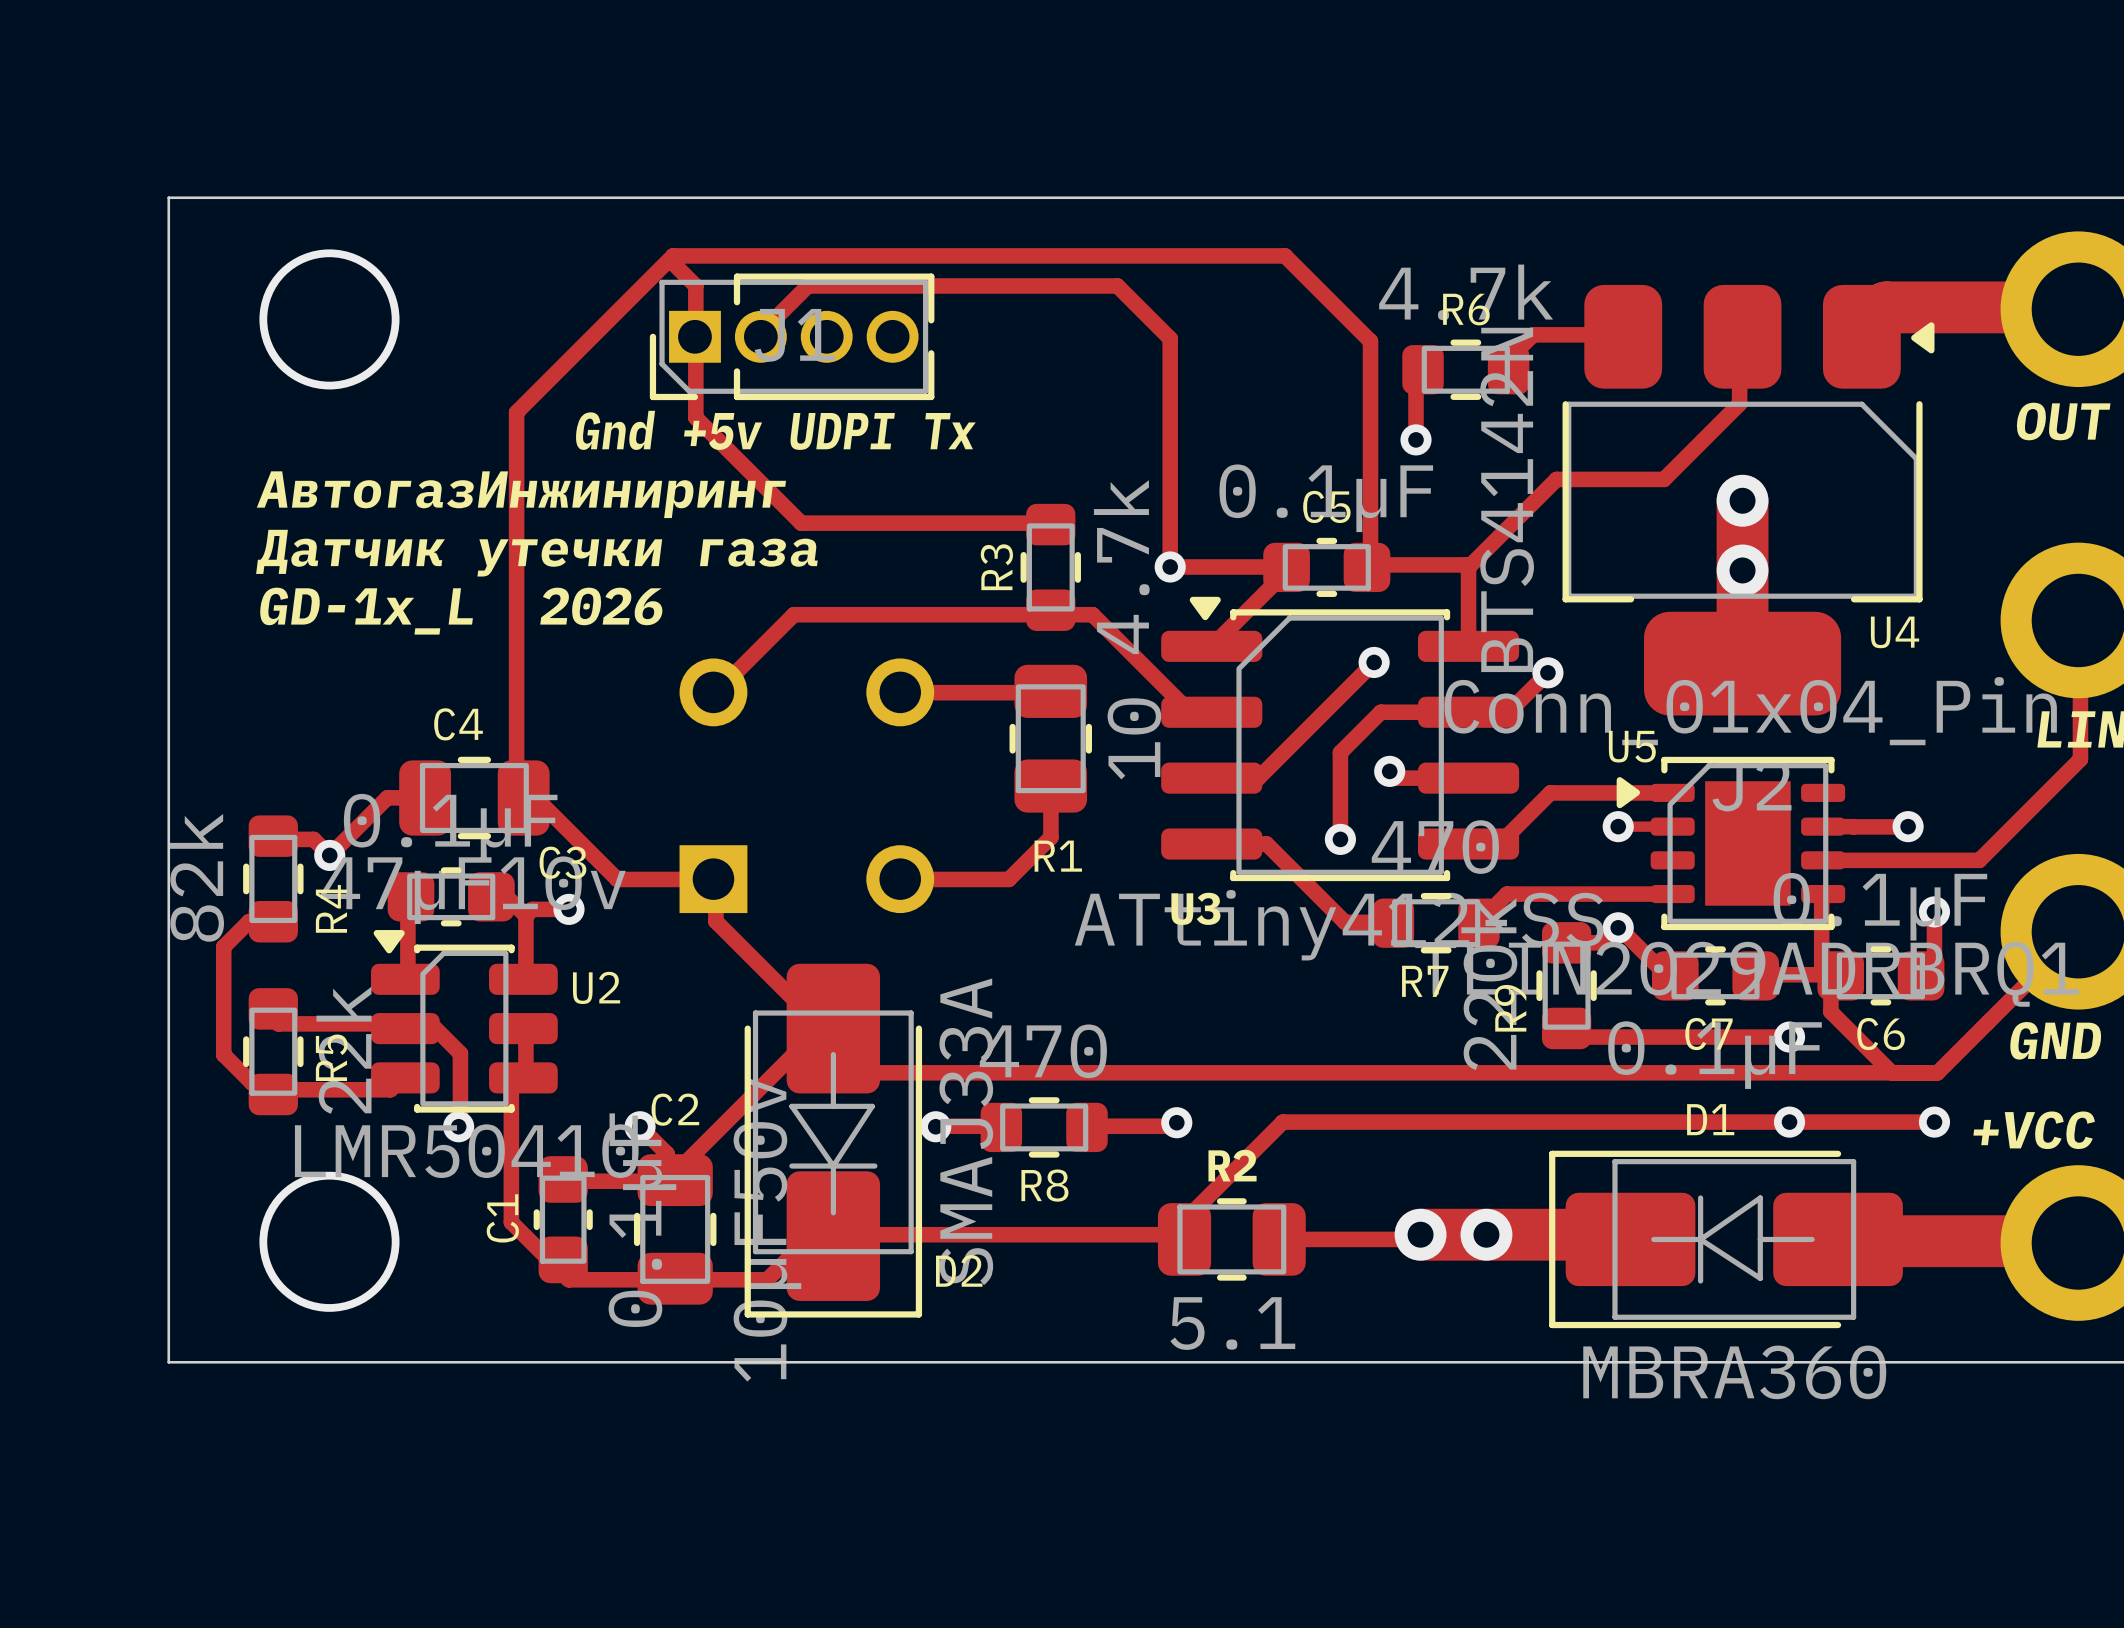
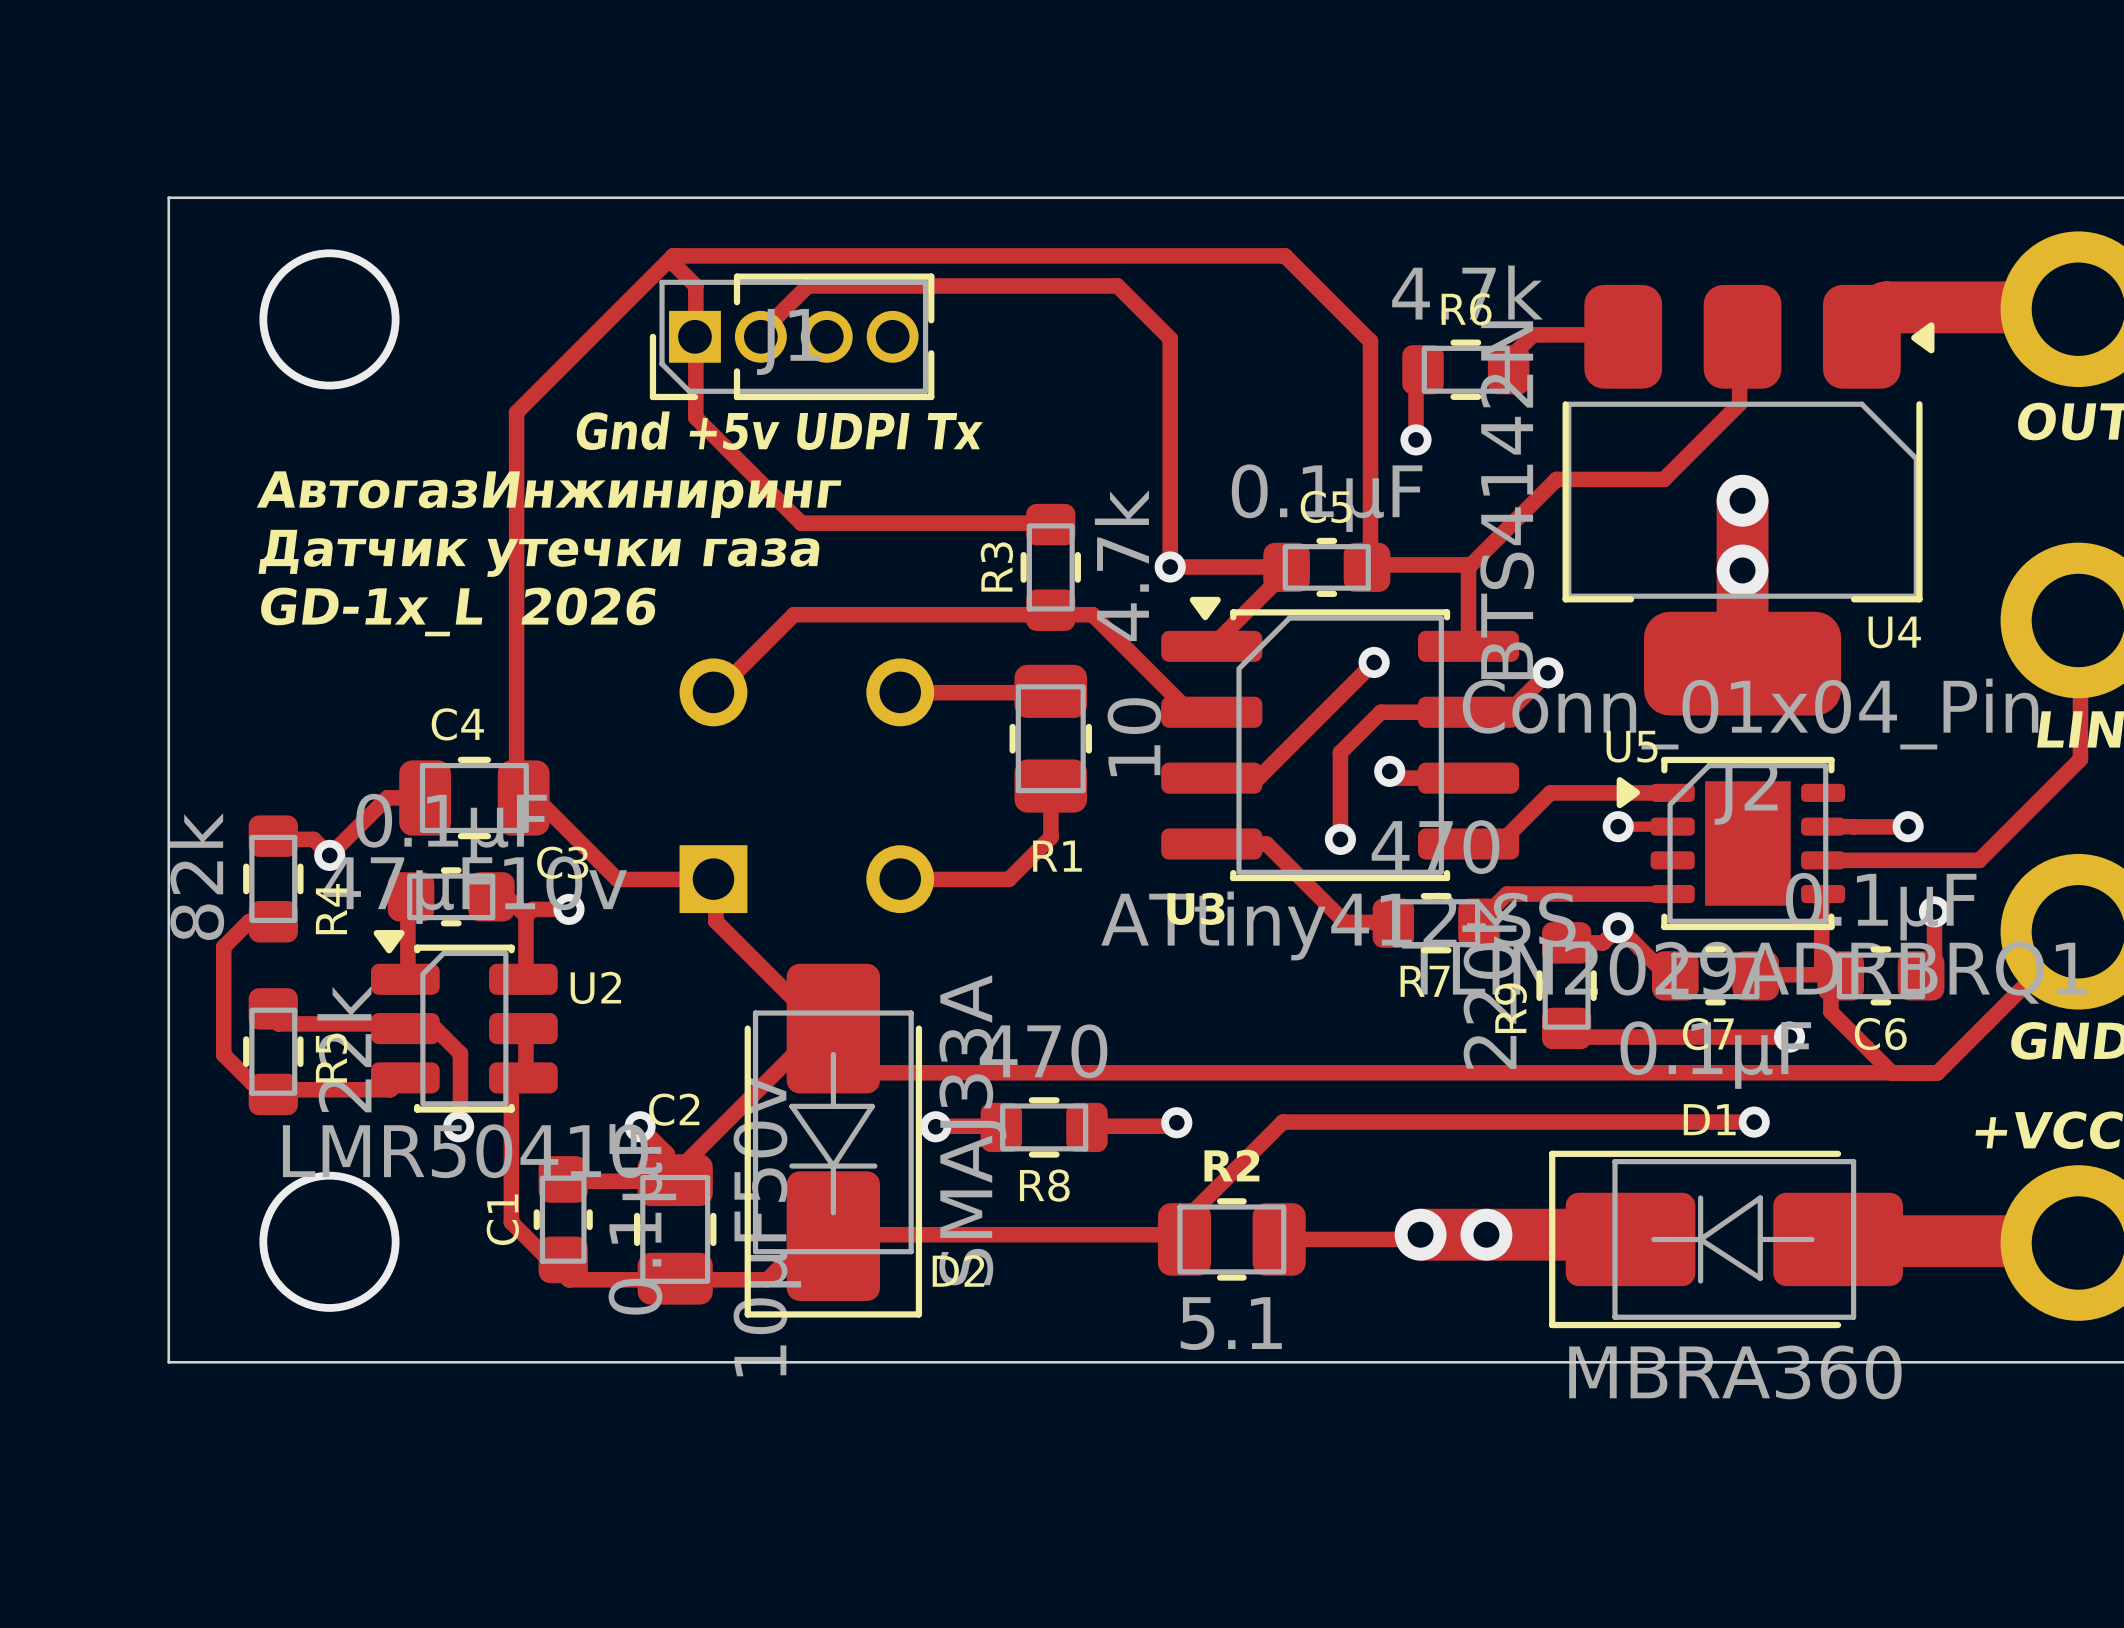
track: (1754, 1122) (1934, 1122) -> none
via position: (1789, 1122) -> (1754, 1122)
via: (1934, 1122) -> none

